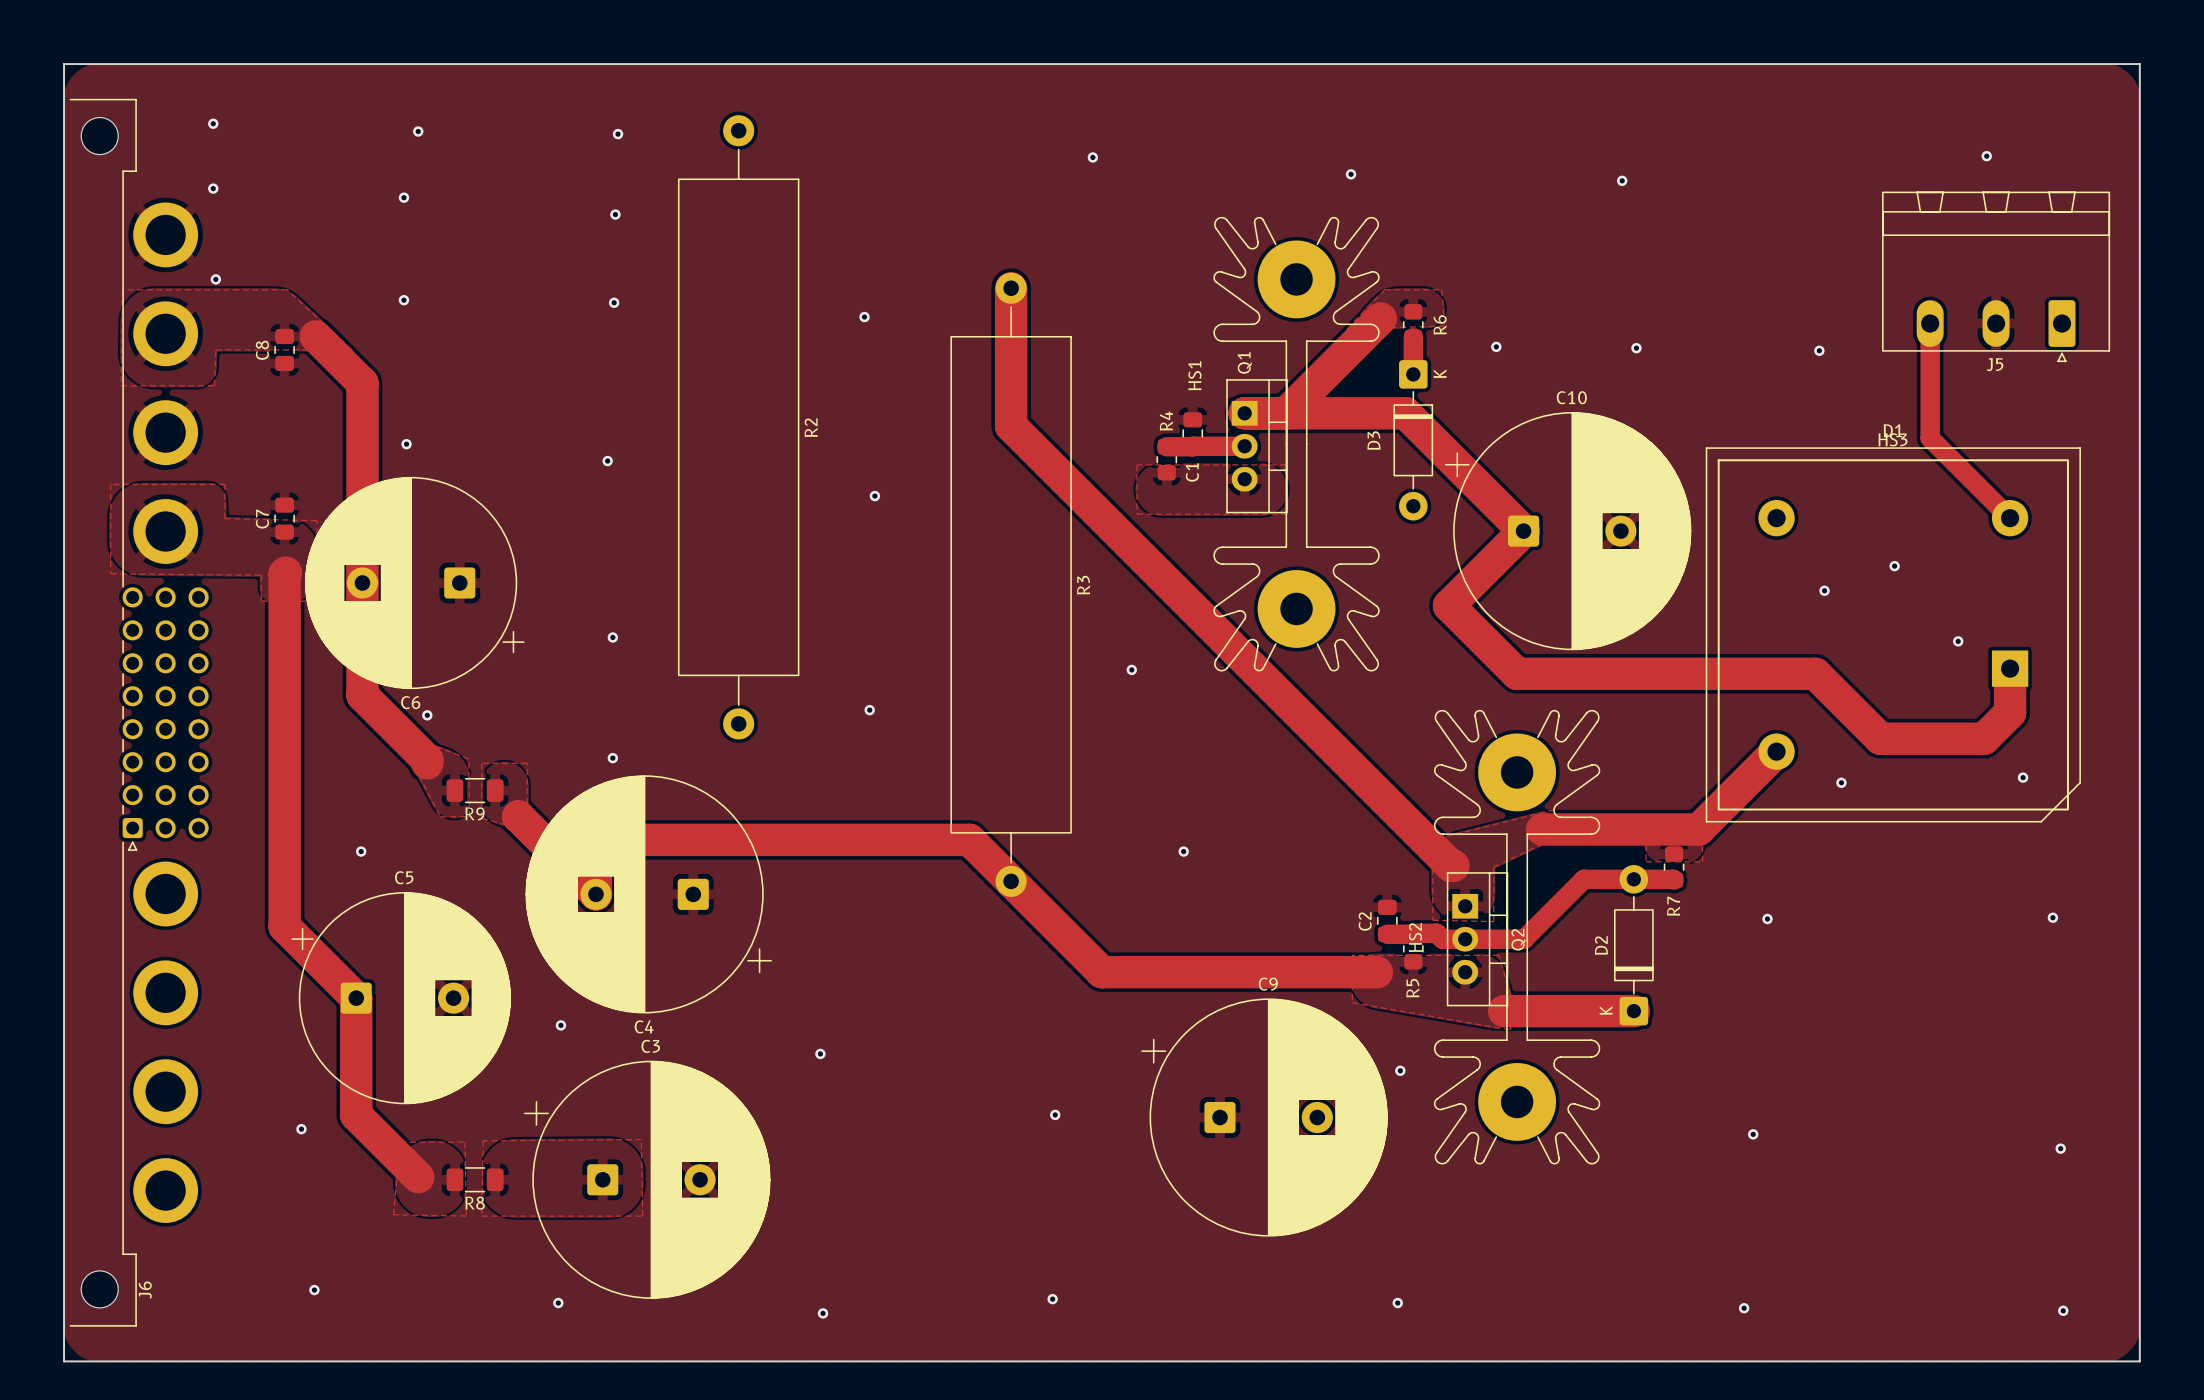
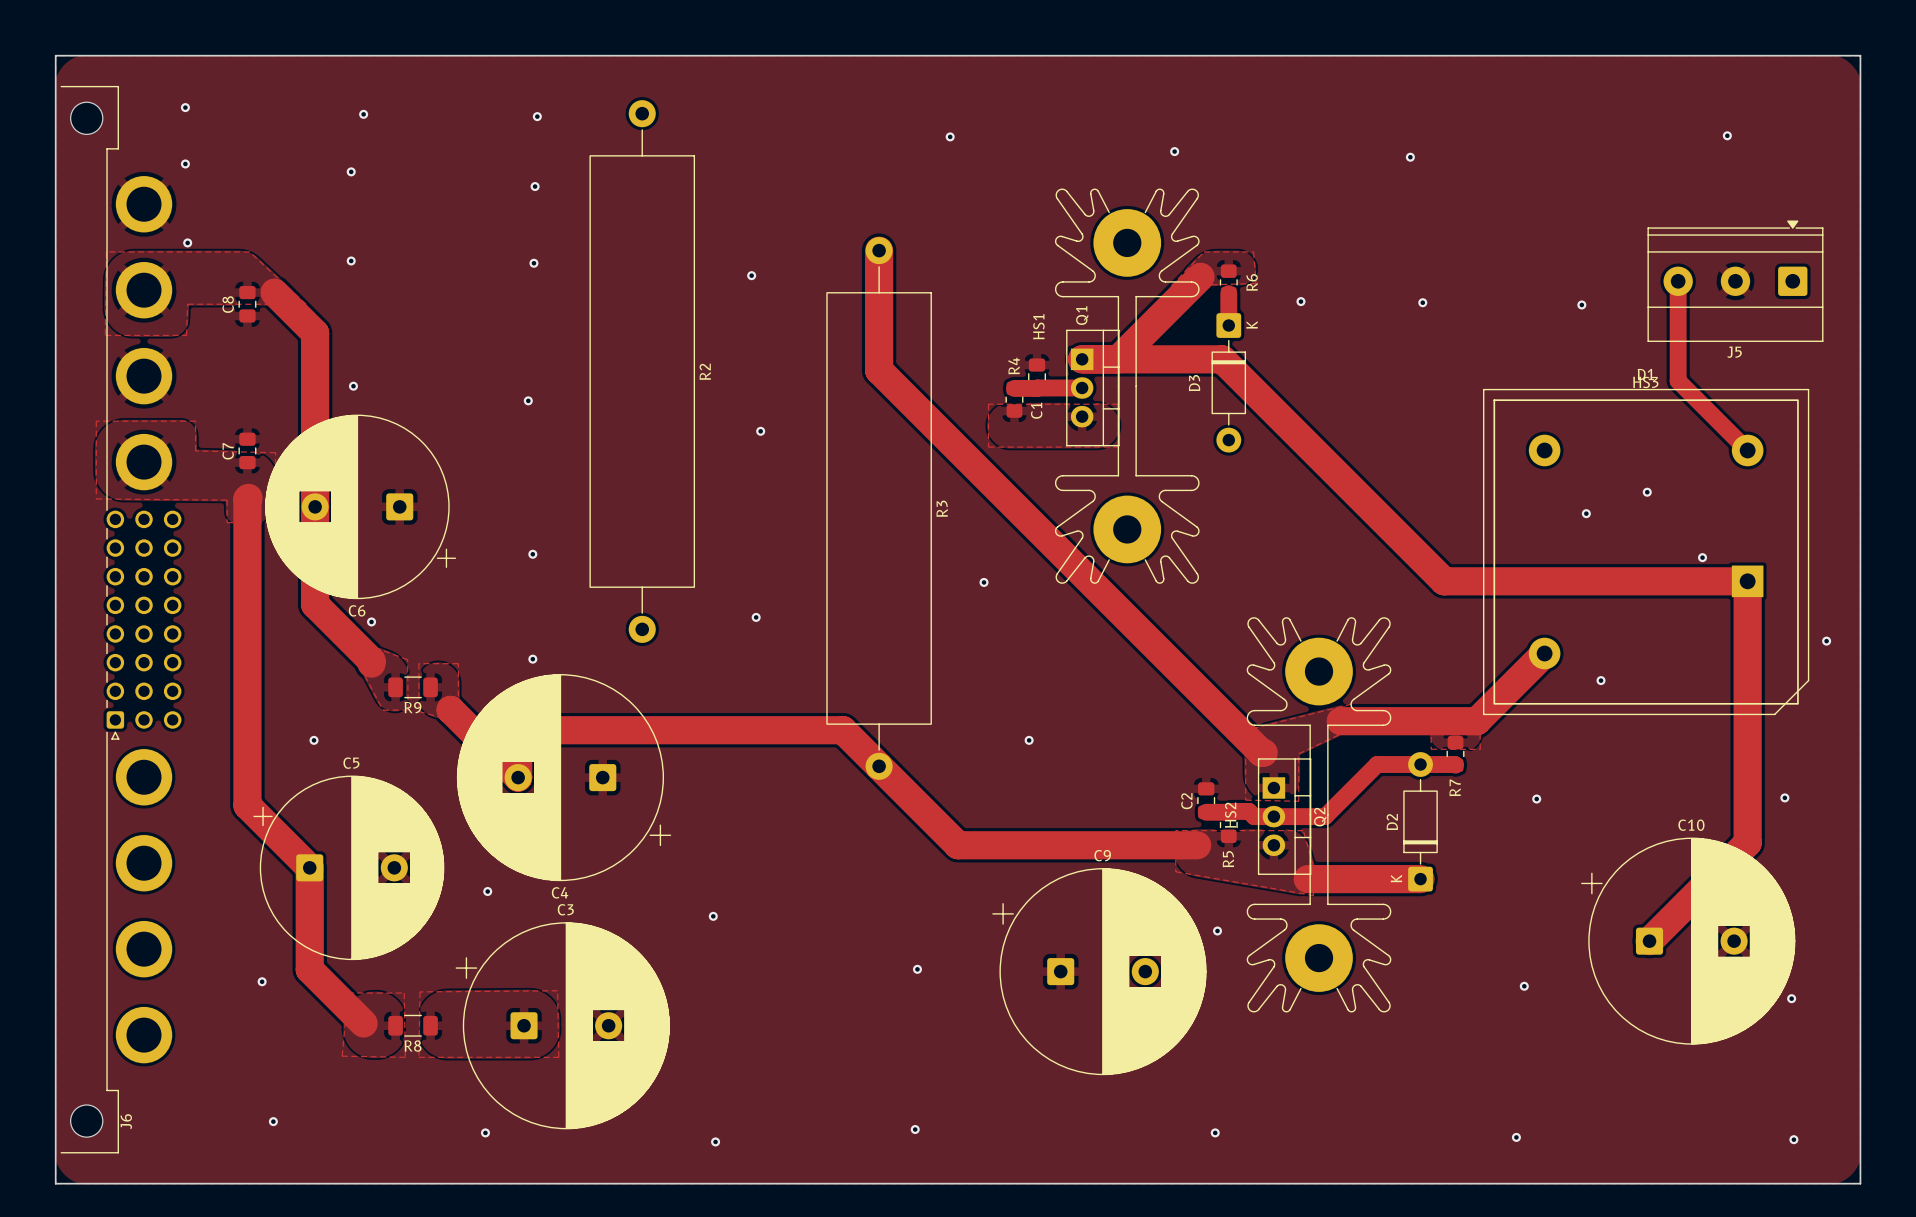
J5 footprint: [1882, 191, 2111, 363] -> [1647, 220, 1824, 342]
track: (1523, 531) (1448, 605) (1517, 673) (1815, 673) (1880, 738) (1984, 738) (2010, 712) -> (1324, 461) (1444, 581) (1747, 581)
C10 position: (1568, 531) -> (1688, 941)
track: none -> (1747, 619) (1747, 843) (1649, 941)
via: none -> (1826, 641)
via: (2023, 777) -> none

